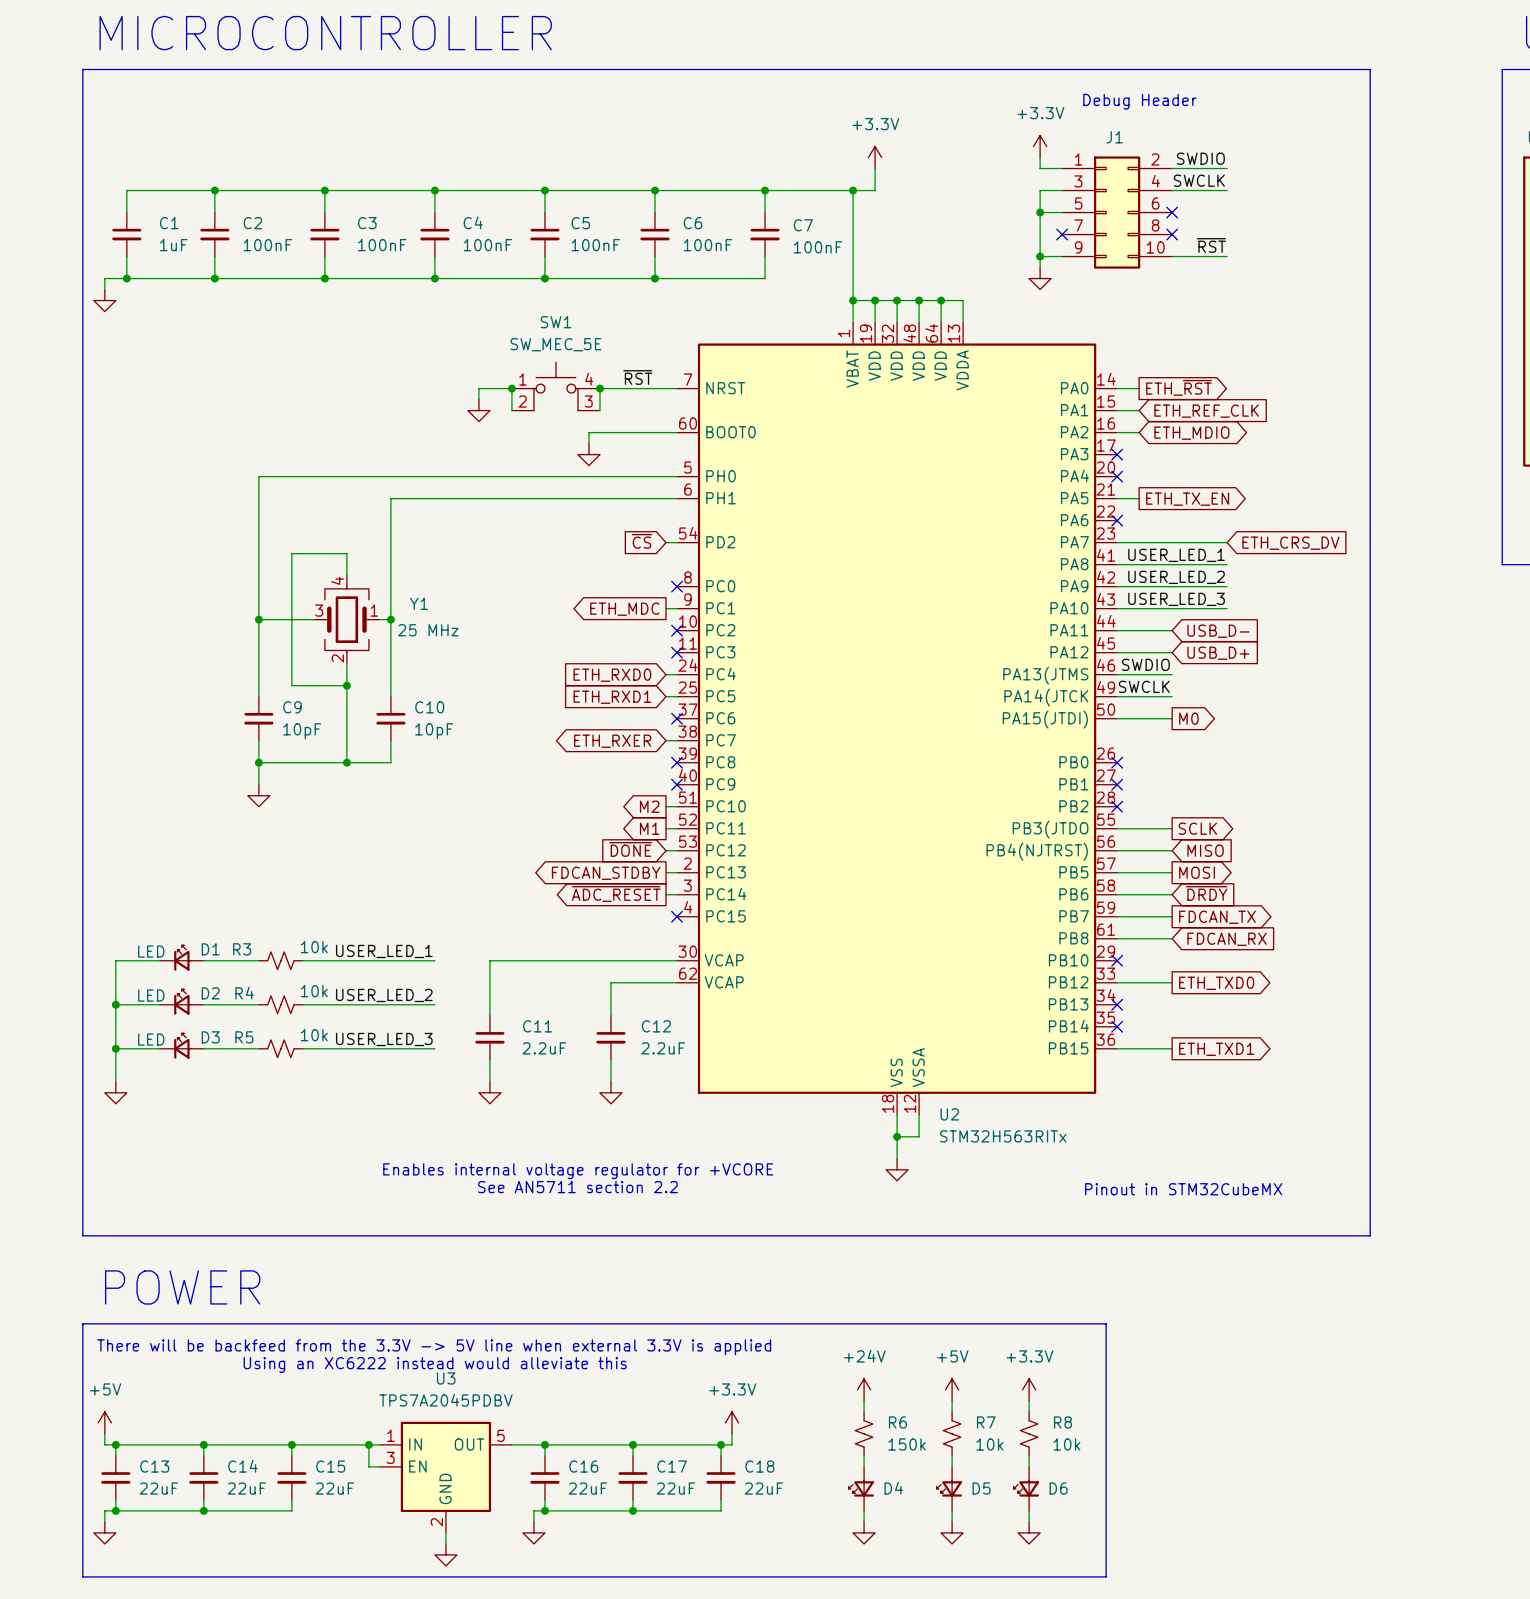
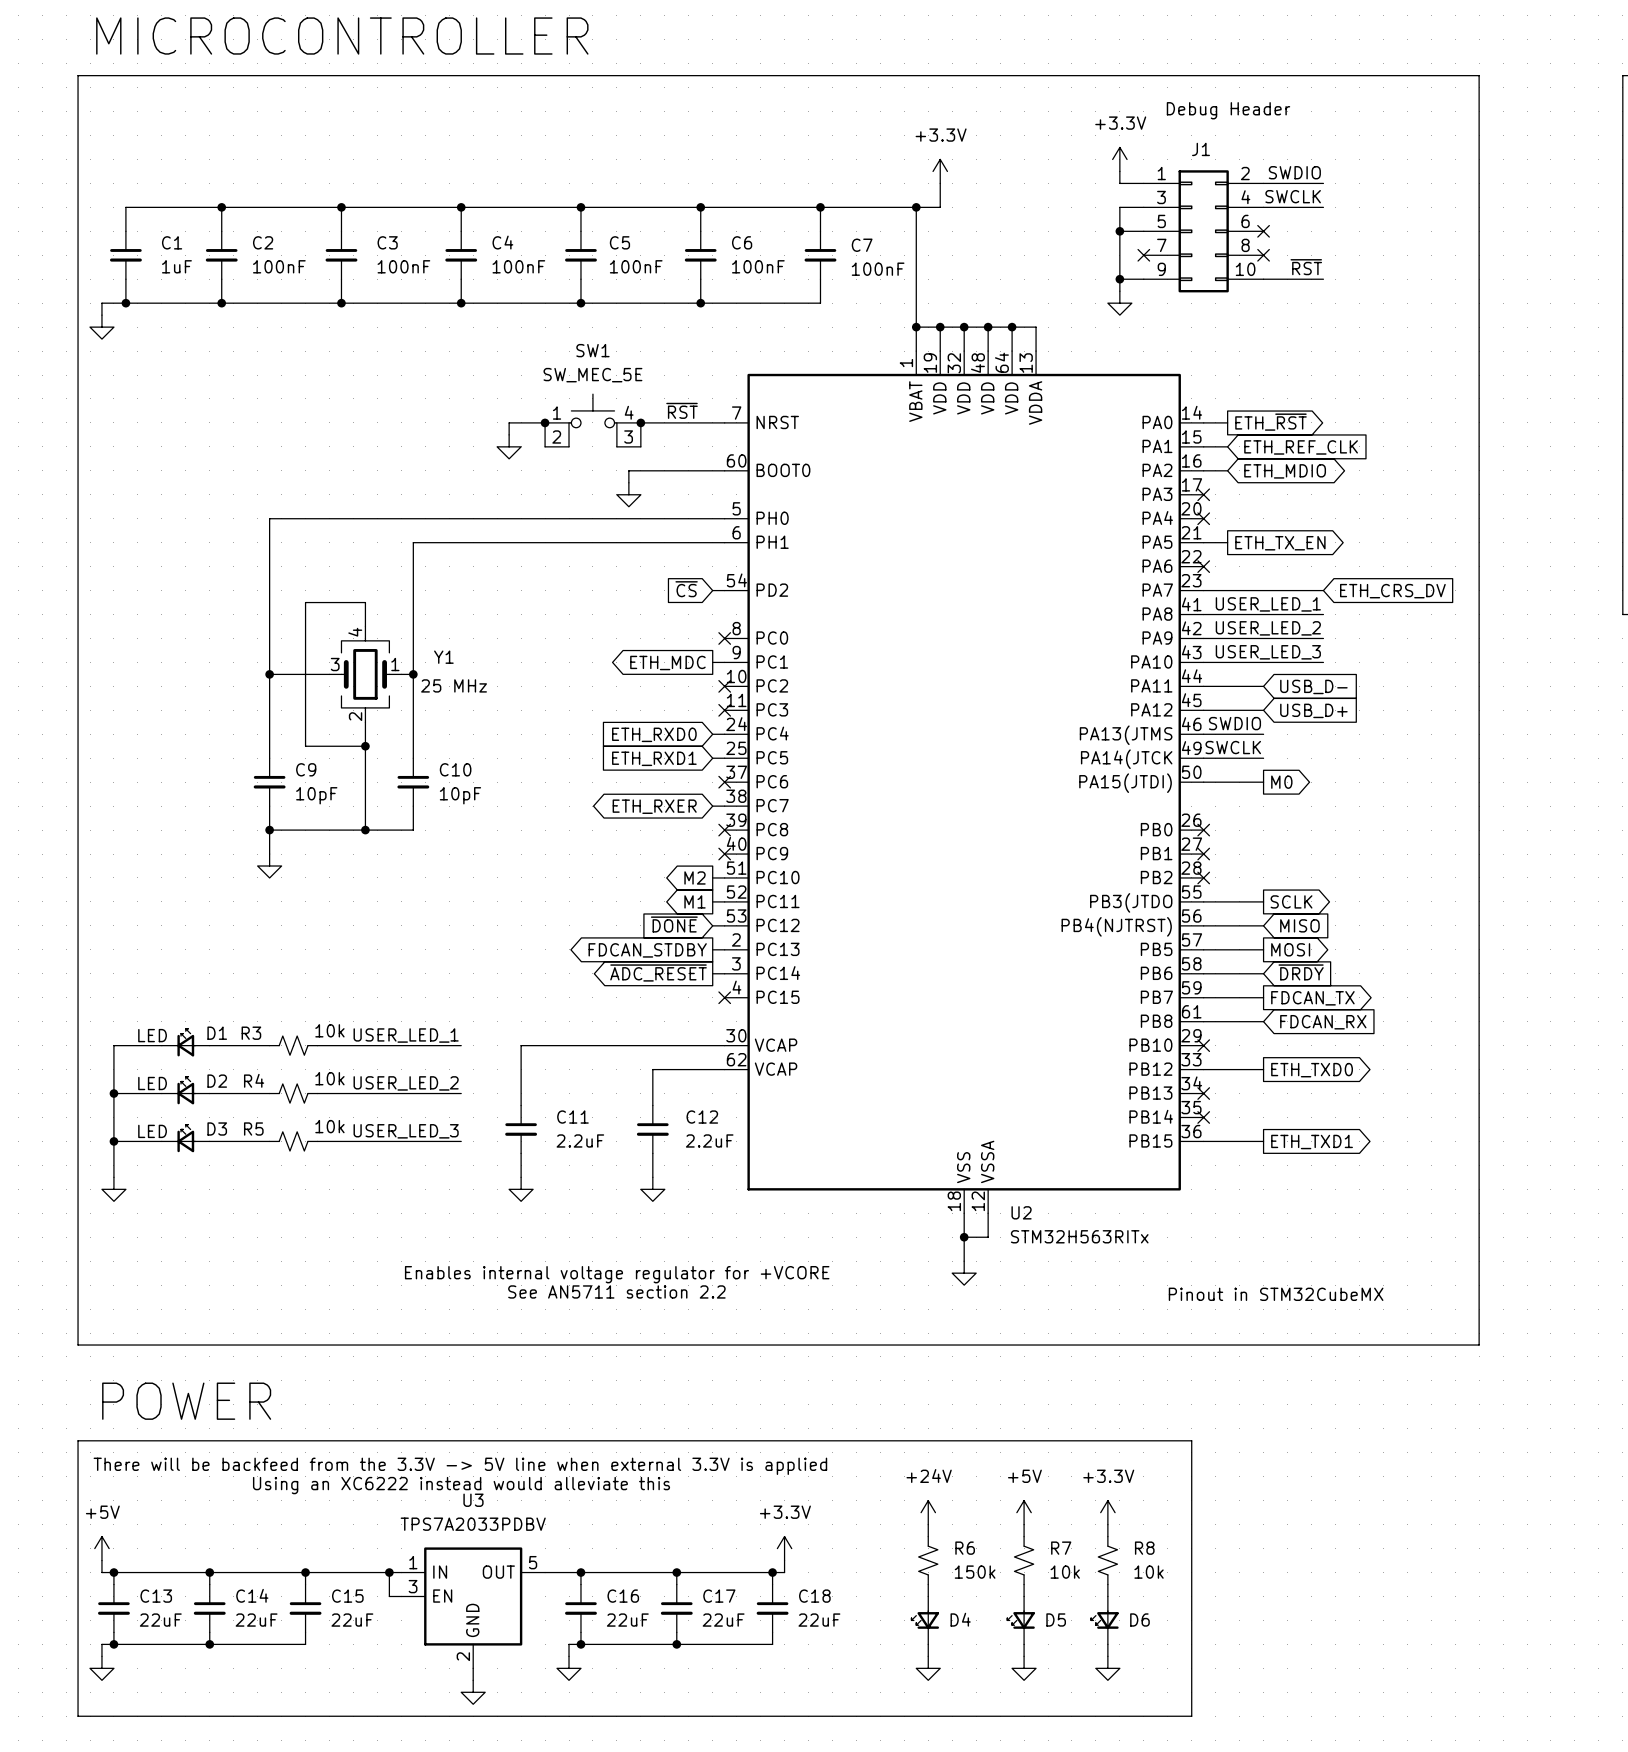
U3 value: TPS7A2045PDBV (445, 1400) -> TPS7A2033PDBV (473, 1524)

